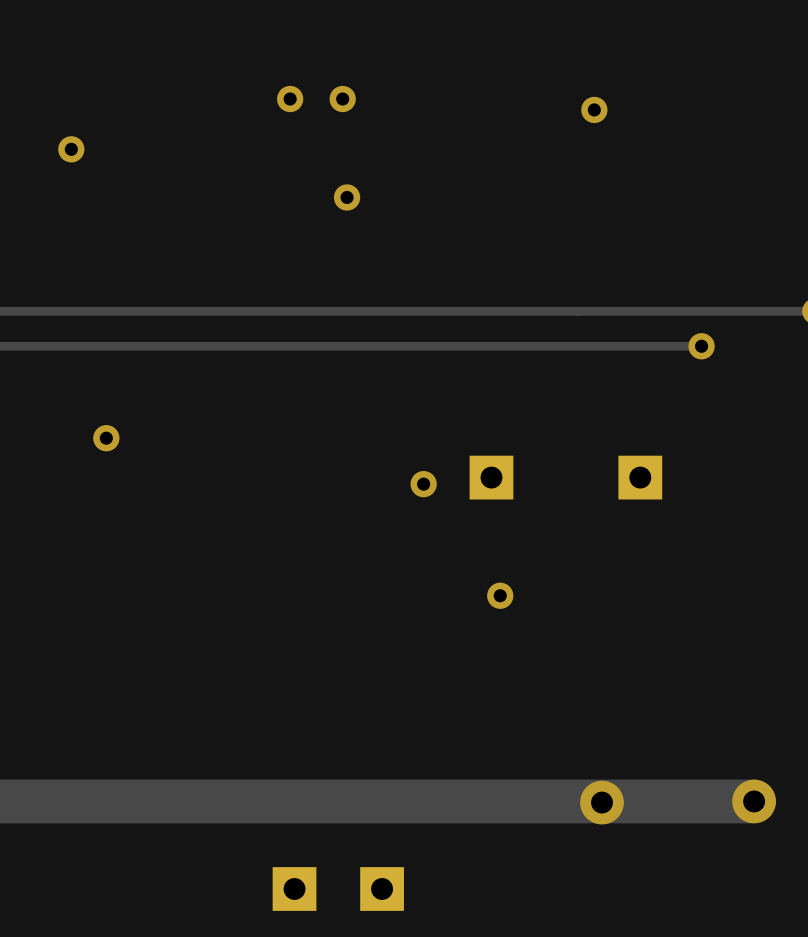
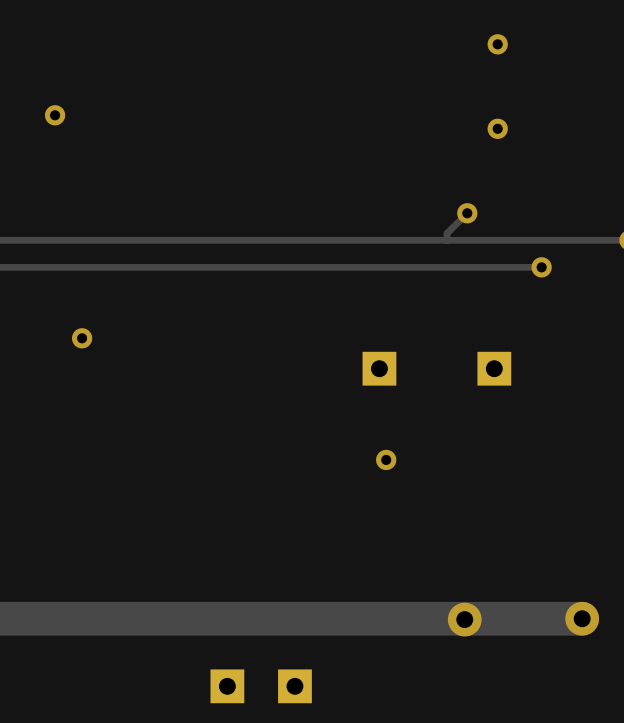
via: none -> (497, 44)
via: (290, 99) -> none
via: (342, 99) -> none
via: (594, 109) -> none
via: none -> (497, 128)
via: (347, 197) -> none
track: none -> (467, 213) (447, 233) (447, 240)
via: none -> (467, 213)
via: (423, 484) -> none

